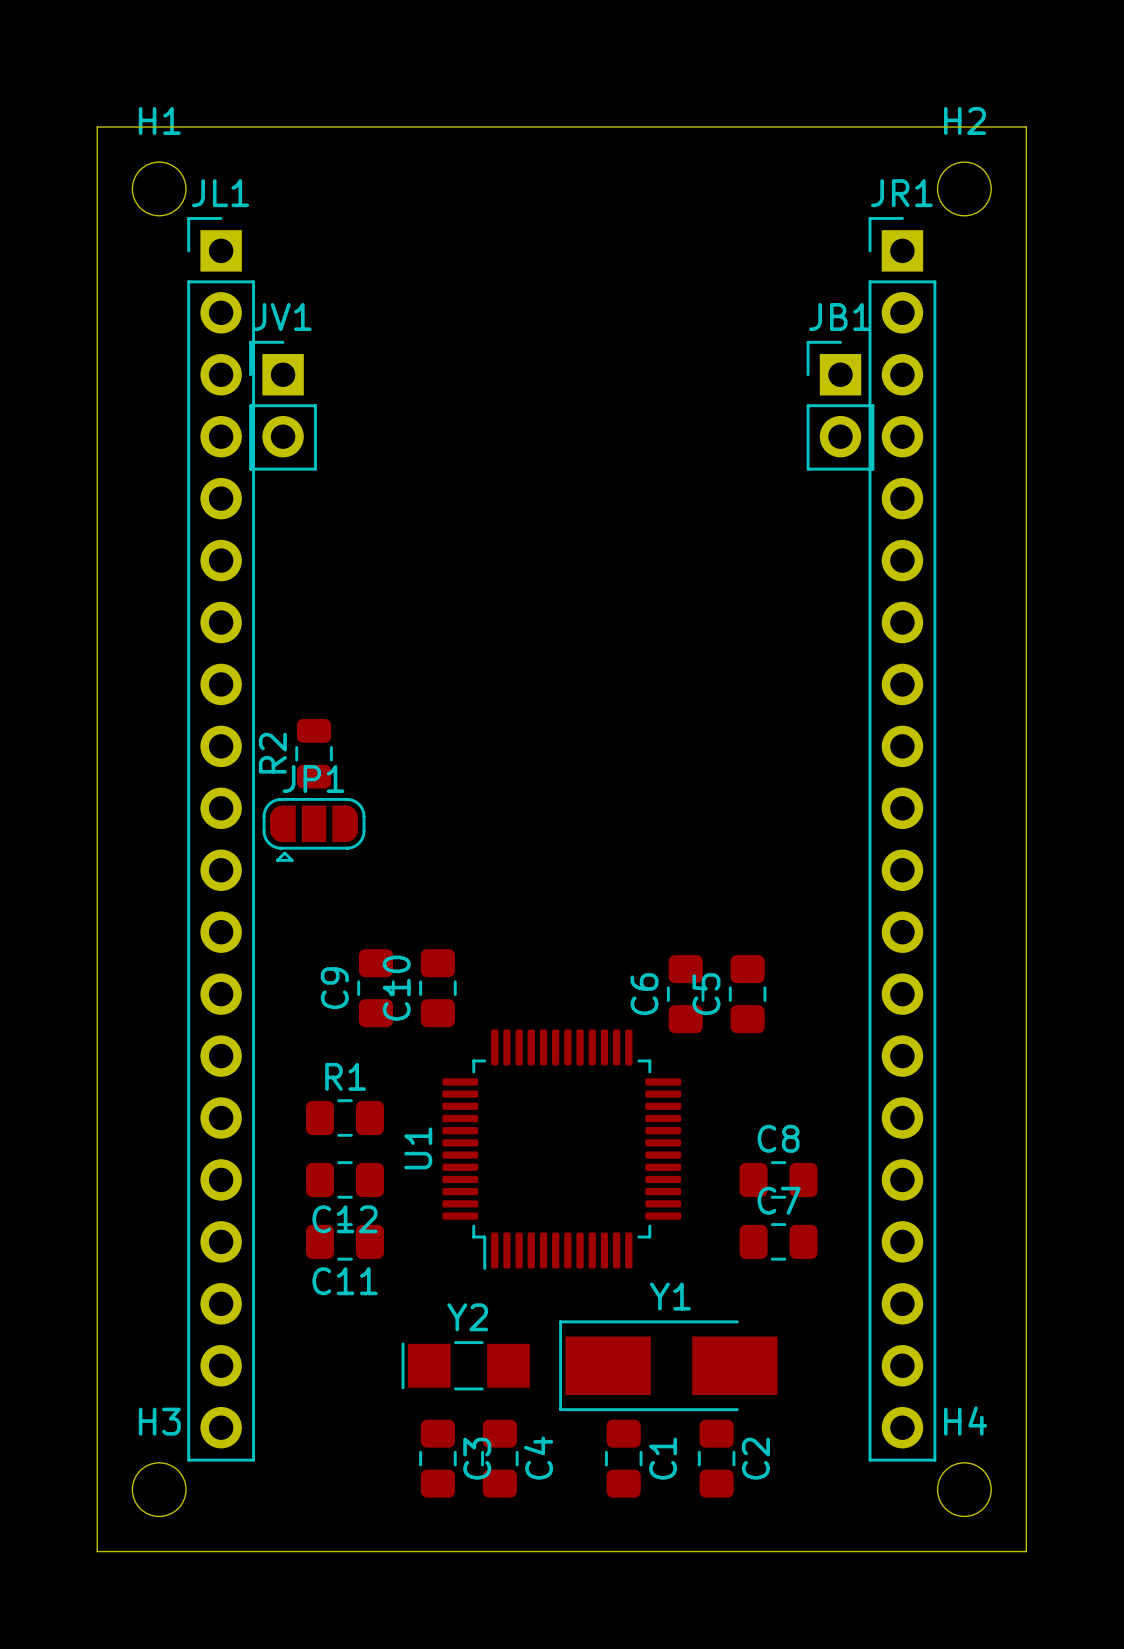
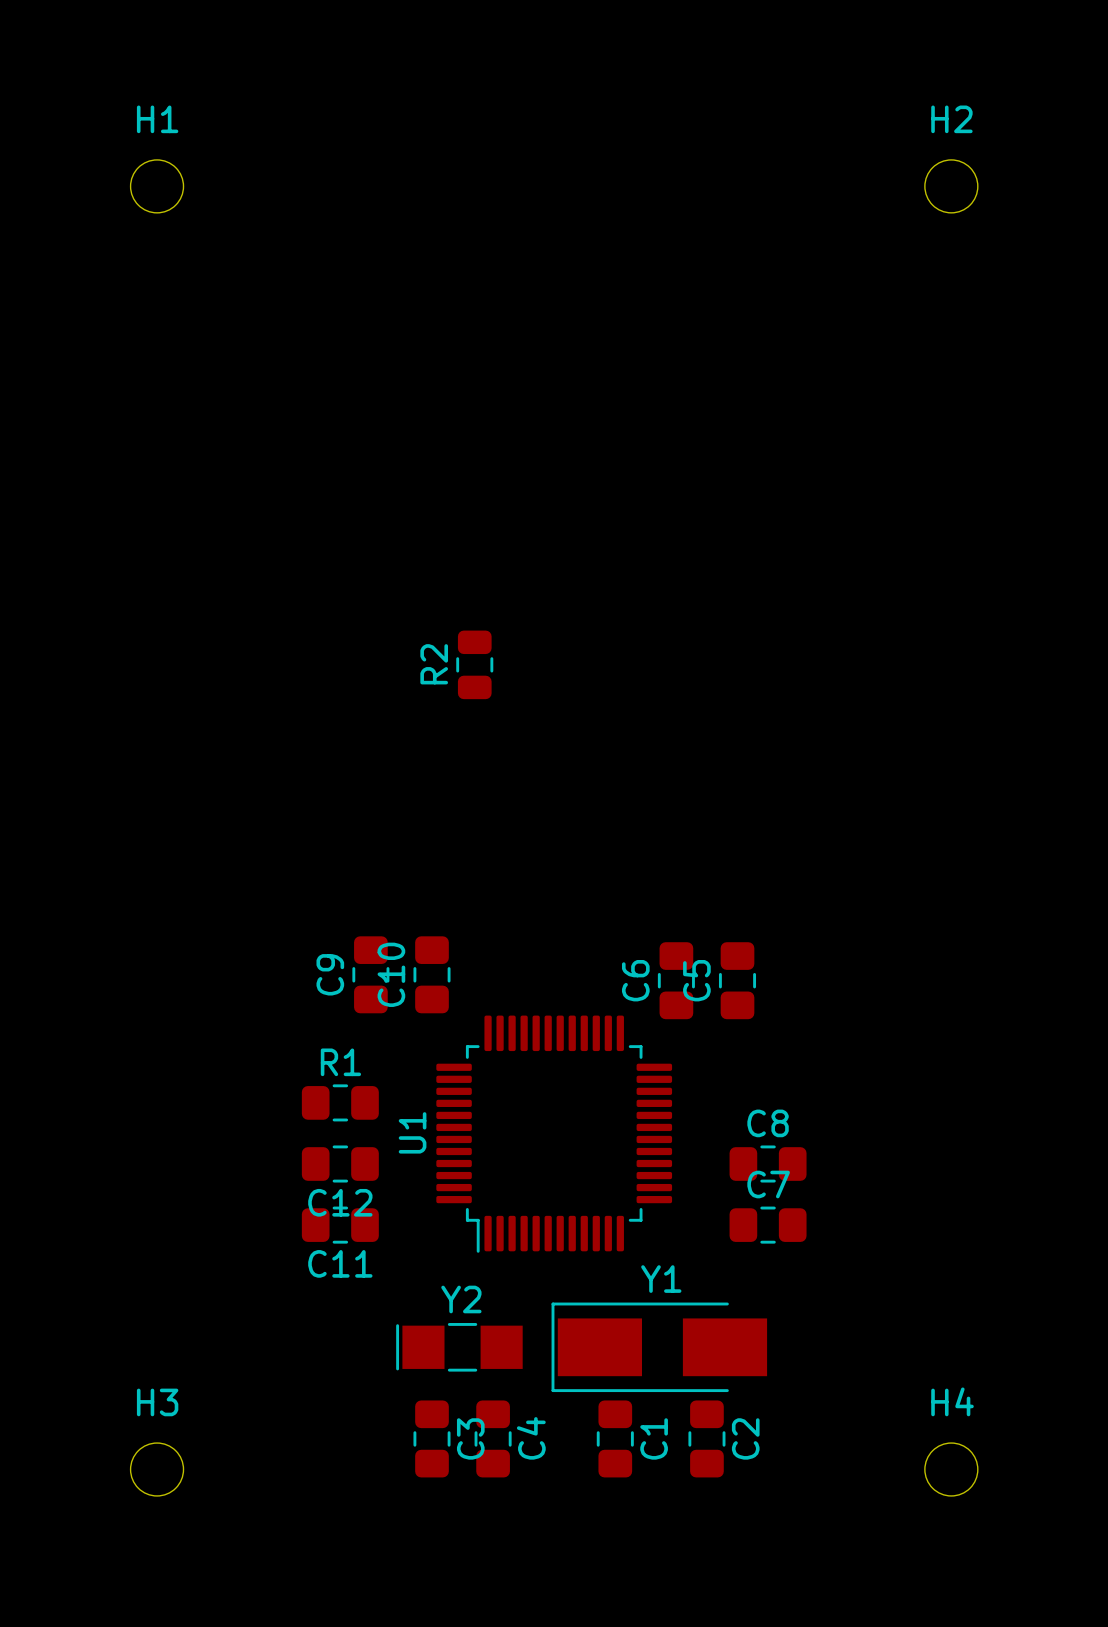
board edge: (97, 127) (1026, 127) (1026, 1551) (97, 1551) (97, 127) -> none
JV1: (283, 405) -> none
JB1: (840, 405) -> none
R2 position: (314, 753) -> (474, 664)
JP1: (314, 829) -> none
JL1: (221, 839) -> none
JR1: (902, 839) -> none

